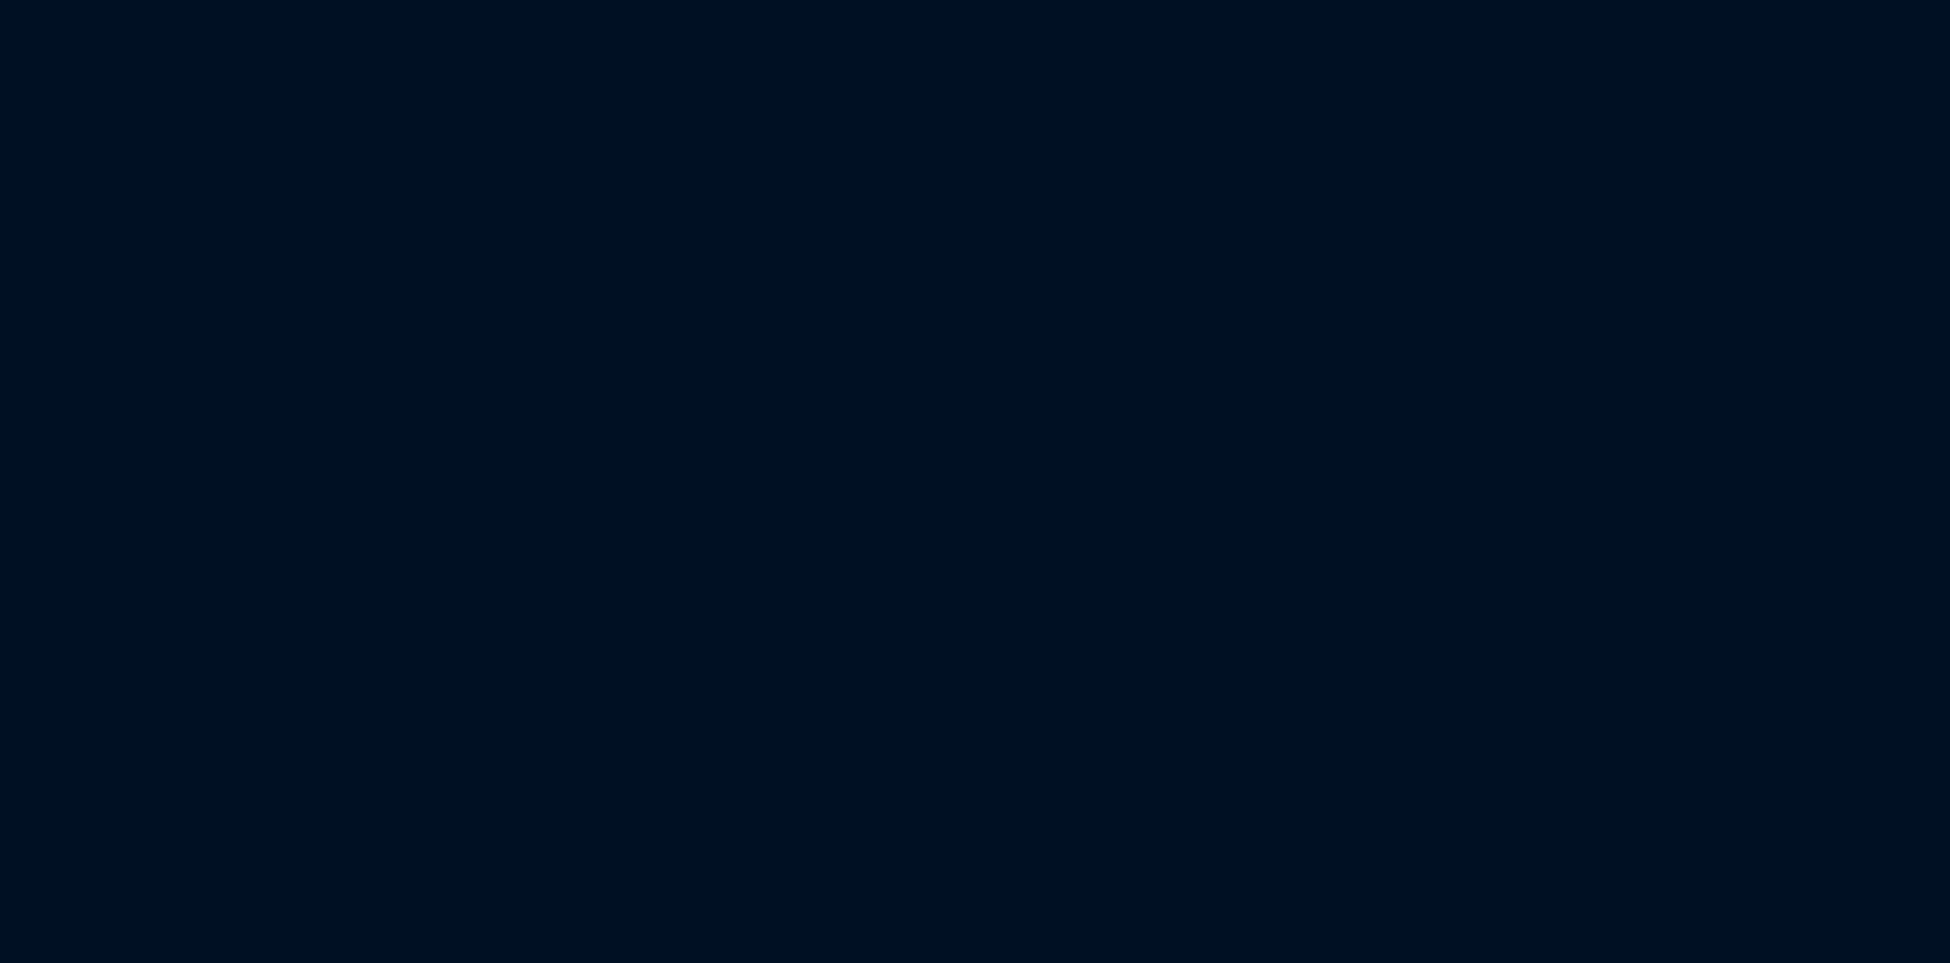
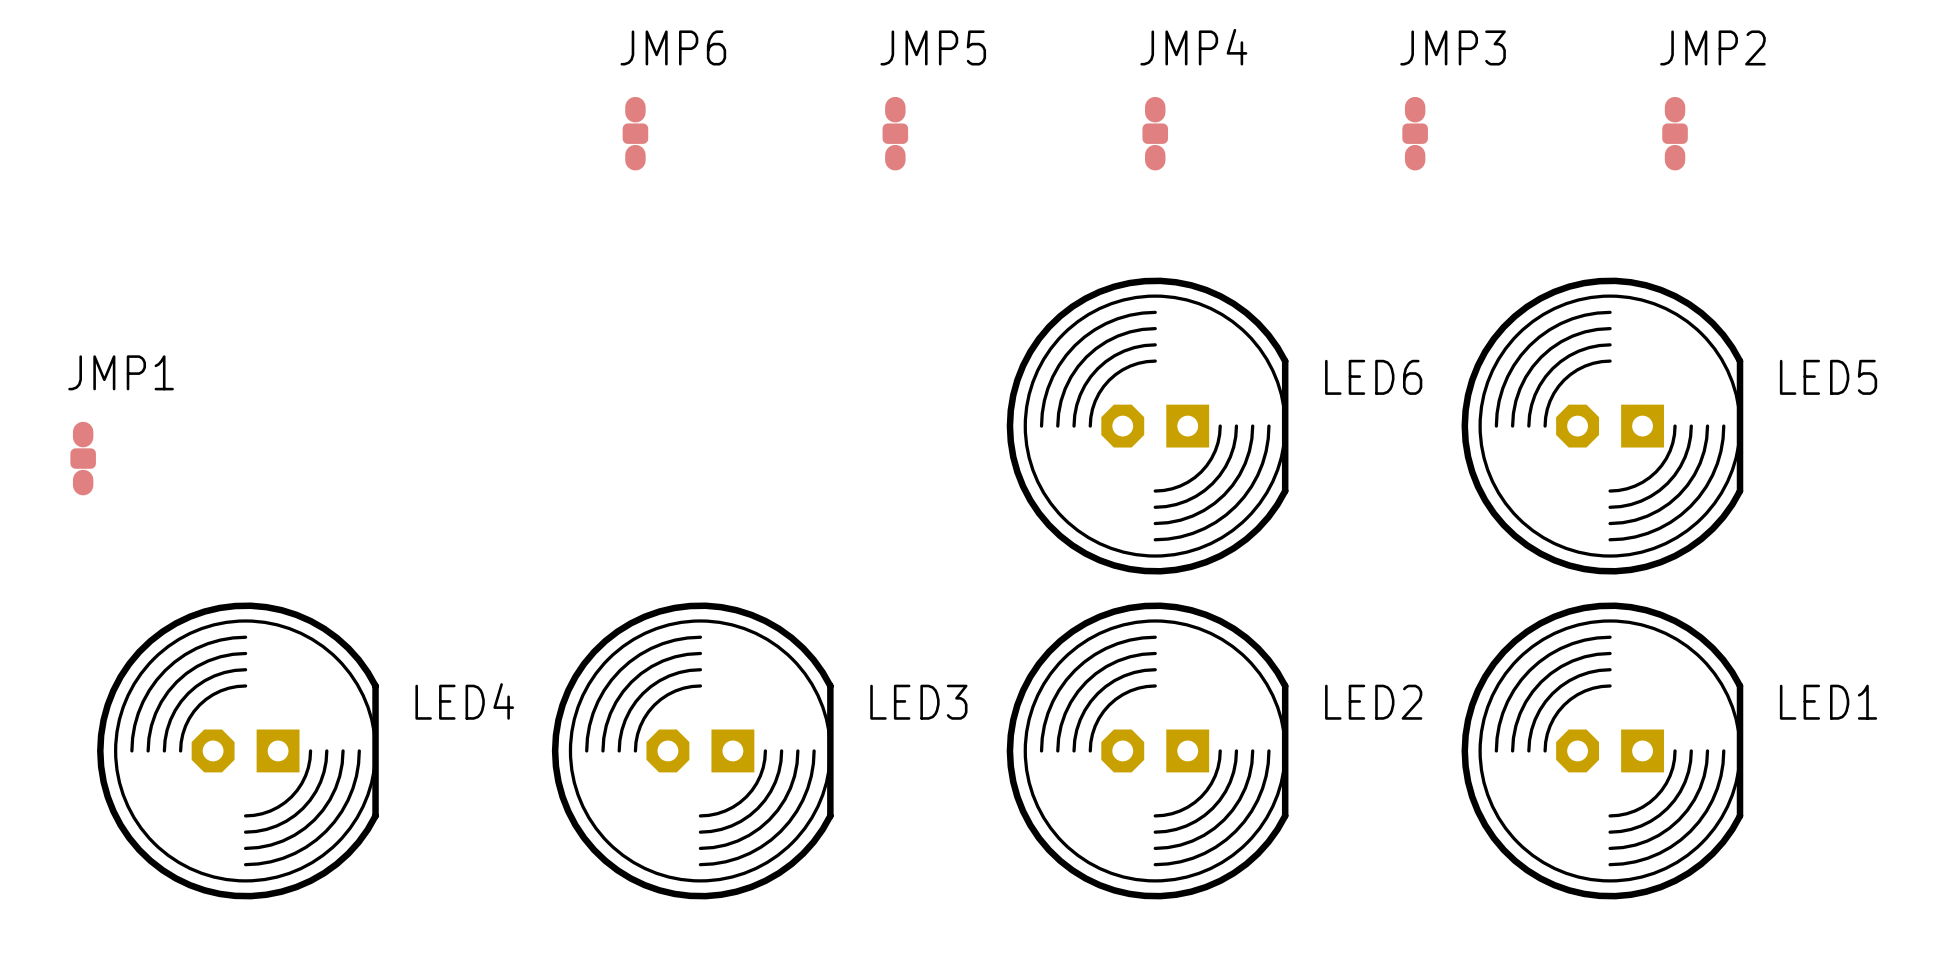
JMP6: none -> (635, 133)
JMP5: none -> (895, 133)
JMP4: none -> (1155, 133)
JMP3: none -> (1415, 133)
JMP2: none -> (1675, 133)
LED6: none -> (1147, 426)
LED5: none -> (1602, 426)
JMP1: none -> (83, 458)
LED4: none -> (237, 750)
LED3: none -> (692, 750)
LED2: none -> (1147, 750)
LED1: none -> (1602, 750)

